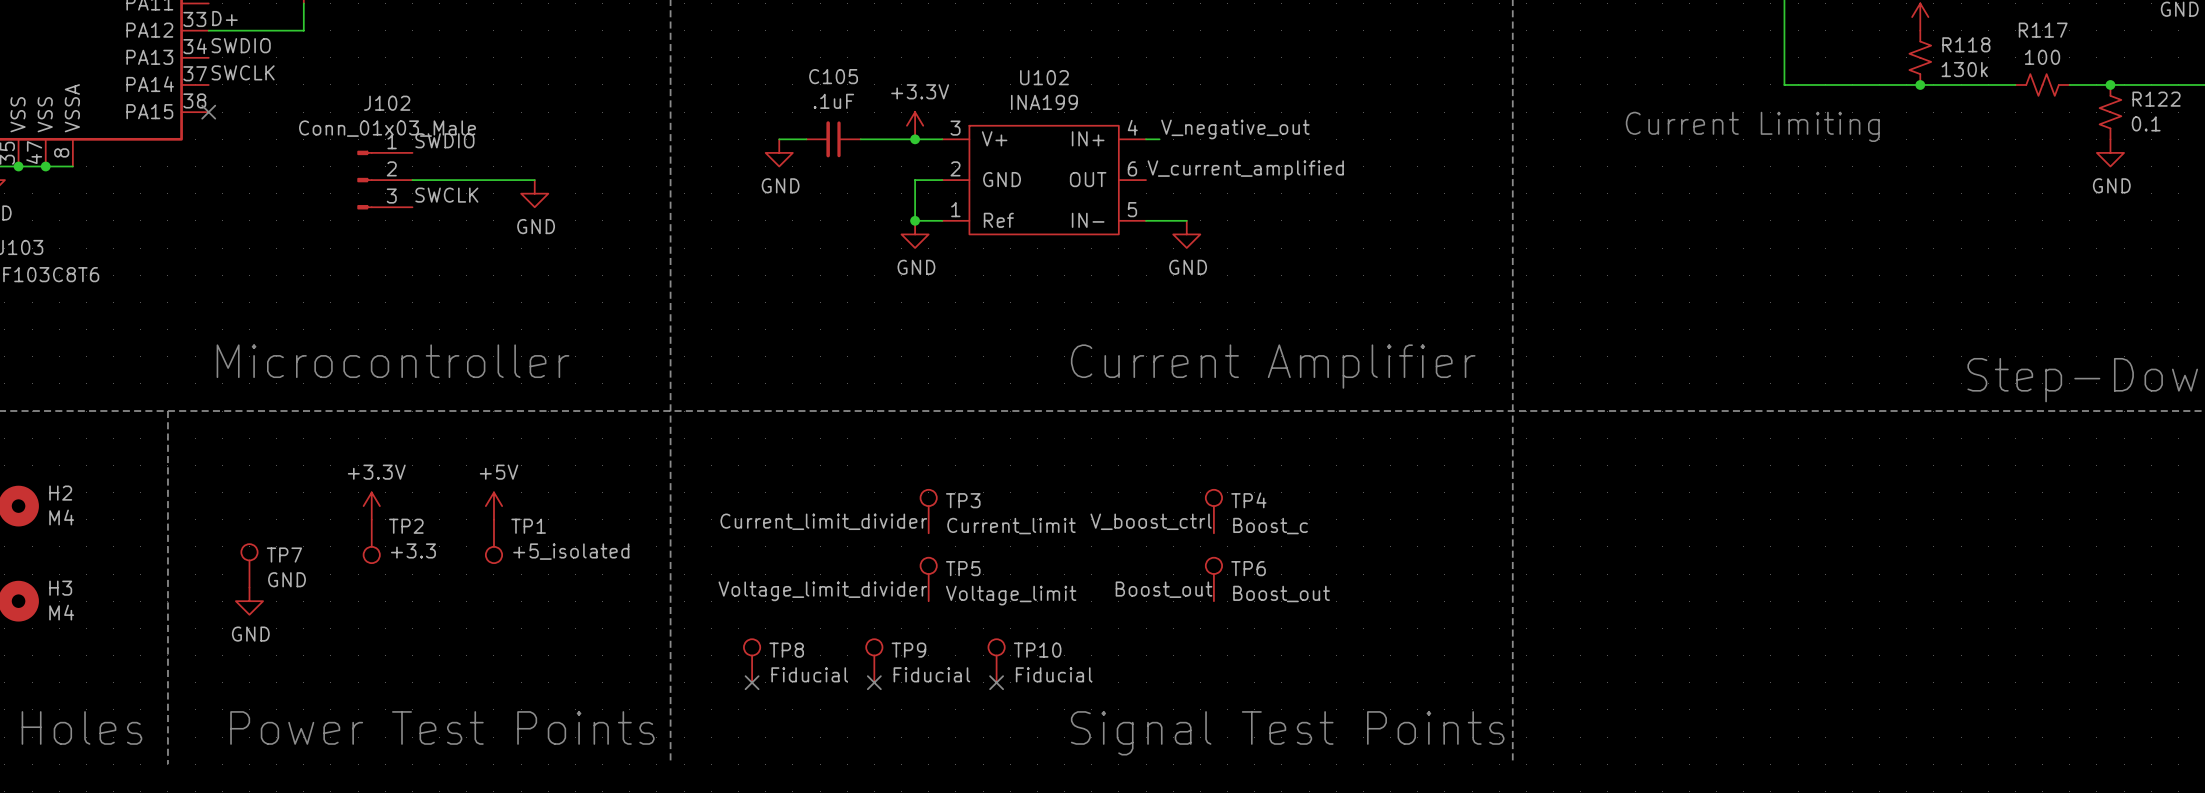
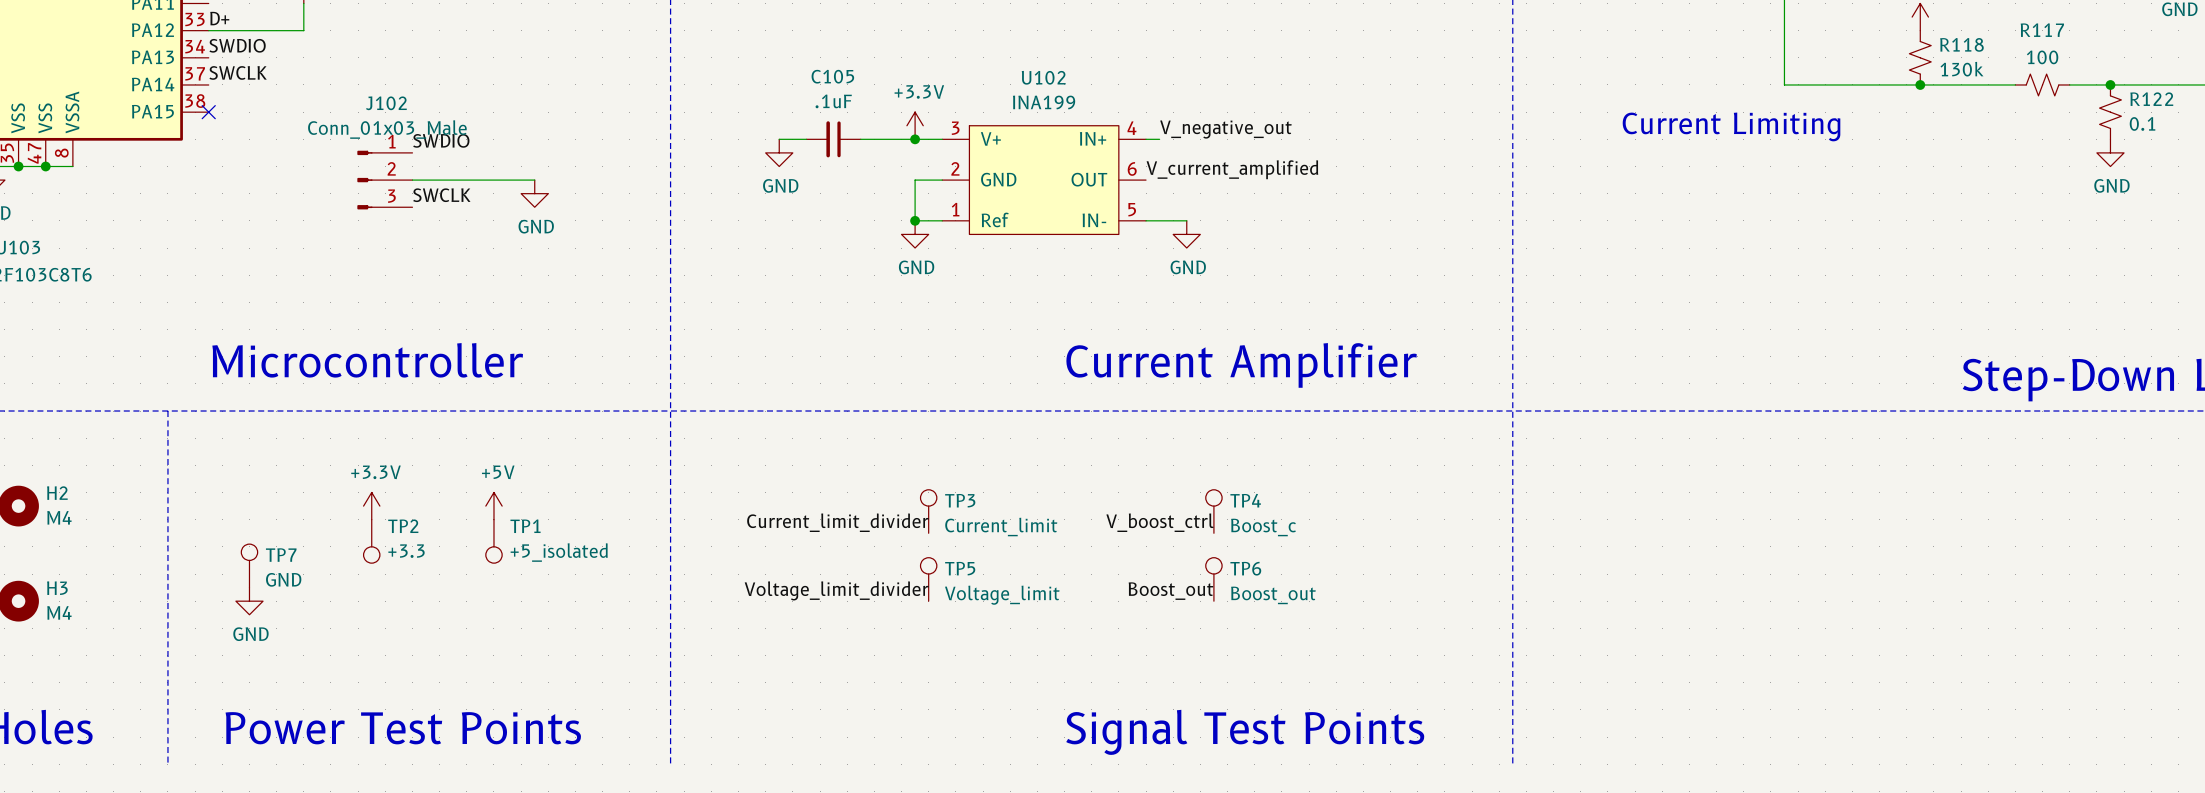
TP8: Fiducial (752, 660) -> none
TP9: Fiducial (874, 660) -> none
TP10: Fiducial (996, 660) -> none
no-connect mark: (752, 682) -> none
no-connect mark: (874, 682) -> none
no-connect mark: (996, 682) -> none

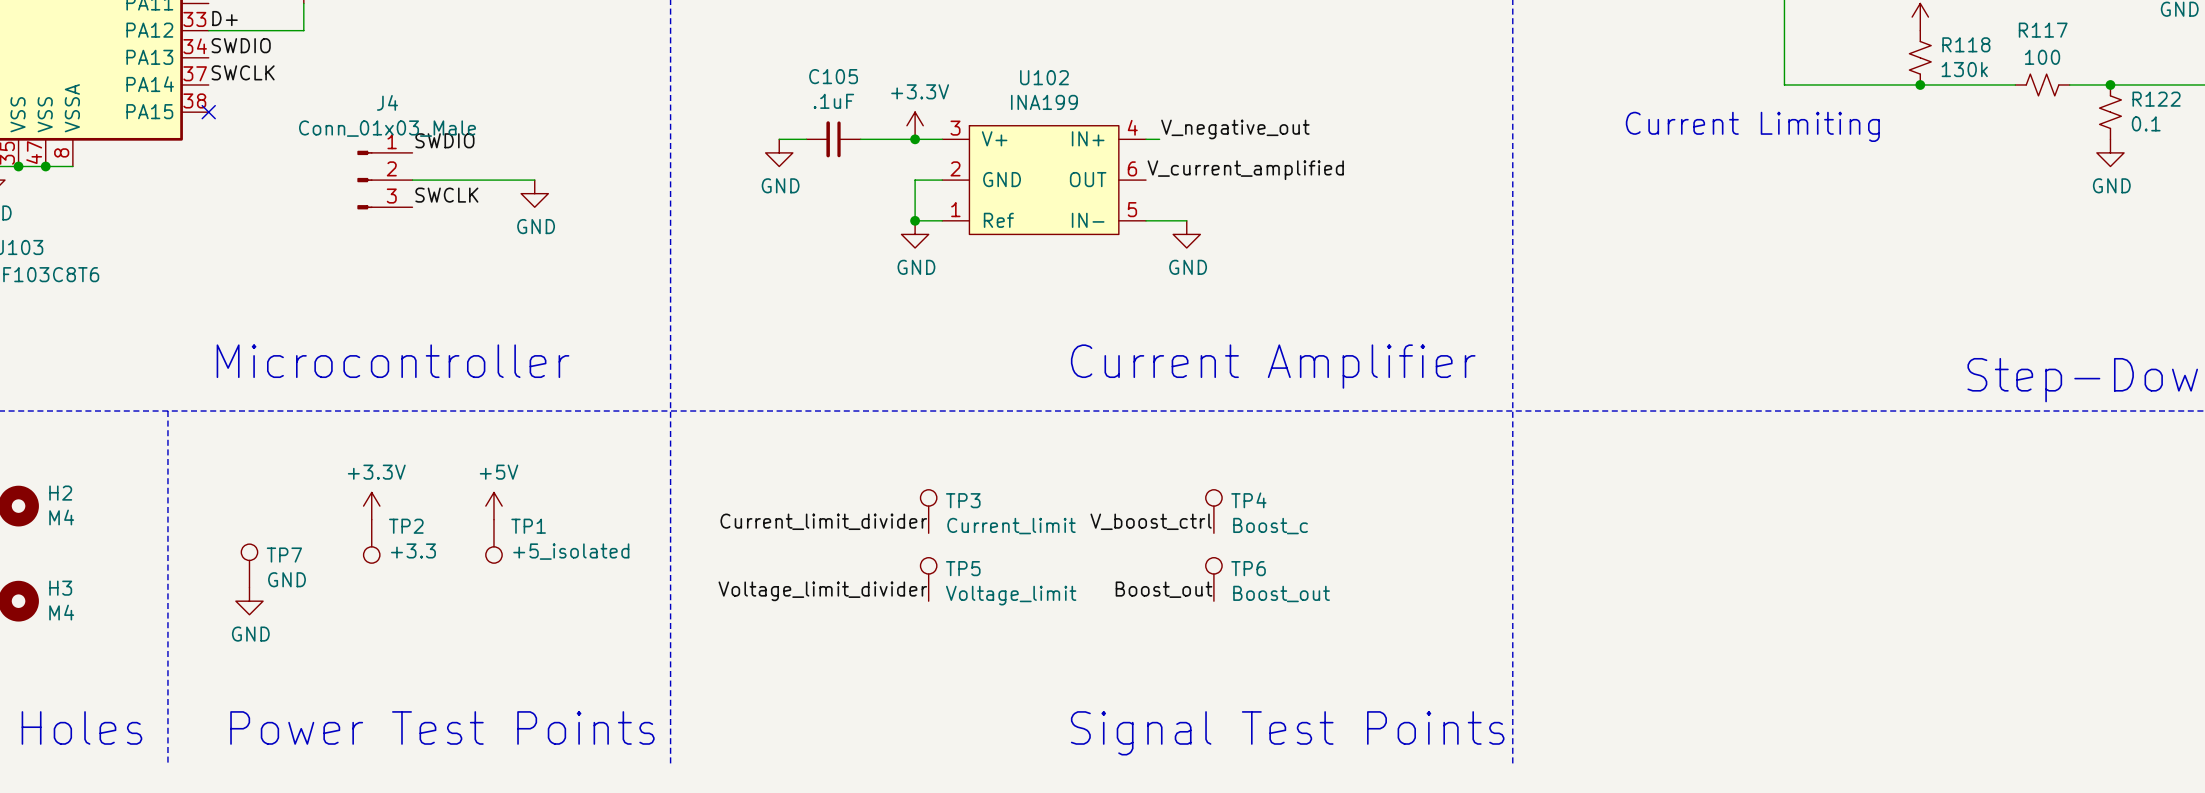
J102 name: J102 (386, 103) -> J4 (387, 102)

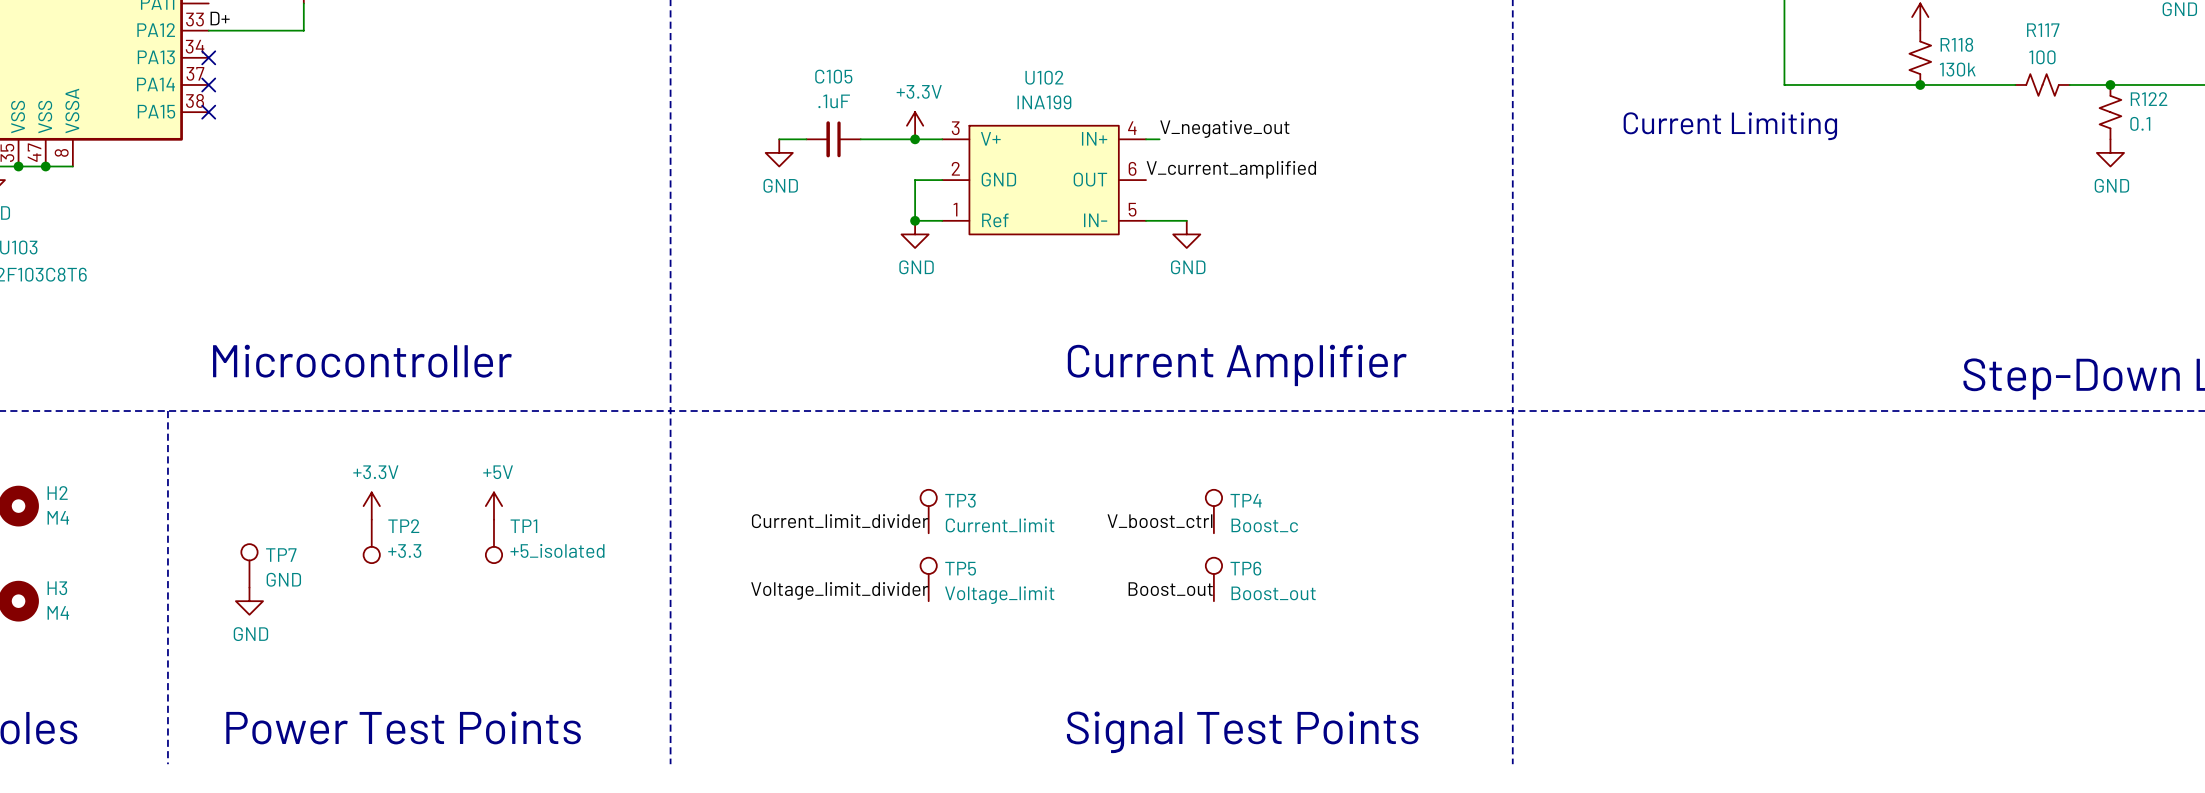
label: SWDIO (241, 45) -> none
no-connect mark: none -> (208, 57)
label: SWCLK (243, 72) -> none
no-connect mark: none -> (208, 84)
label: SWDIO (444, 140) -> none
J4: Conn_01x03_Male (384, 180) -> none
wire: (412, 180) (534, 180) -> none
power symbol: GND (534, 193) -> none
label: SWCLK (446, 195) -> none

